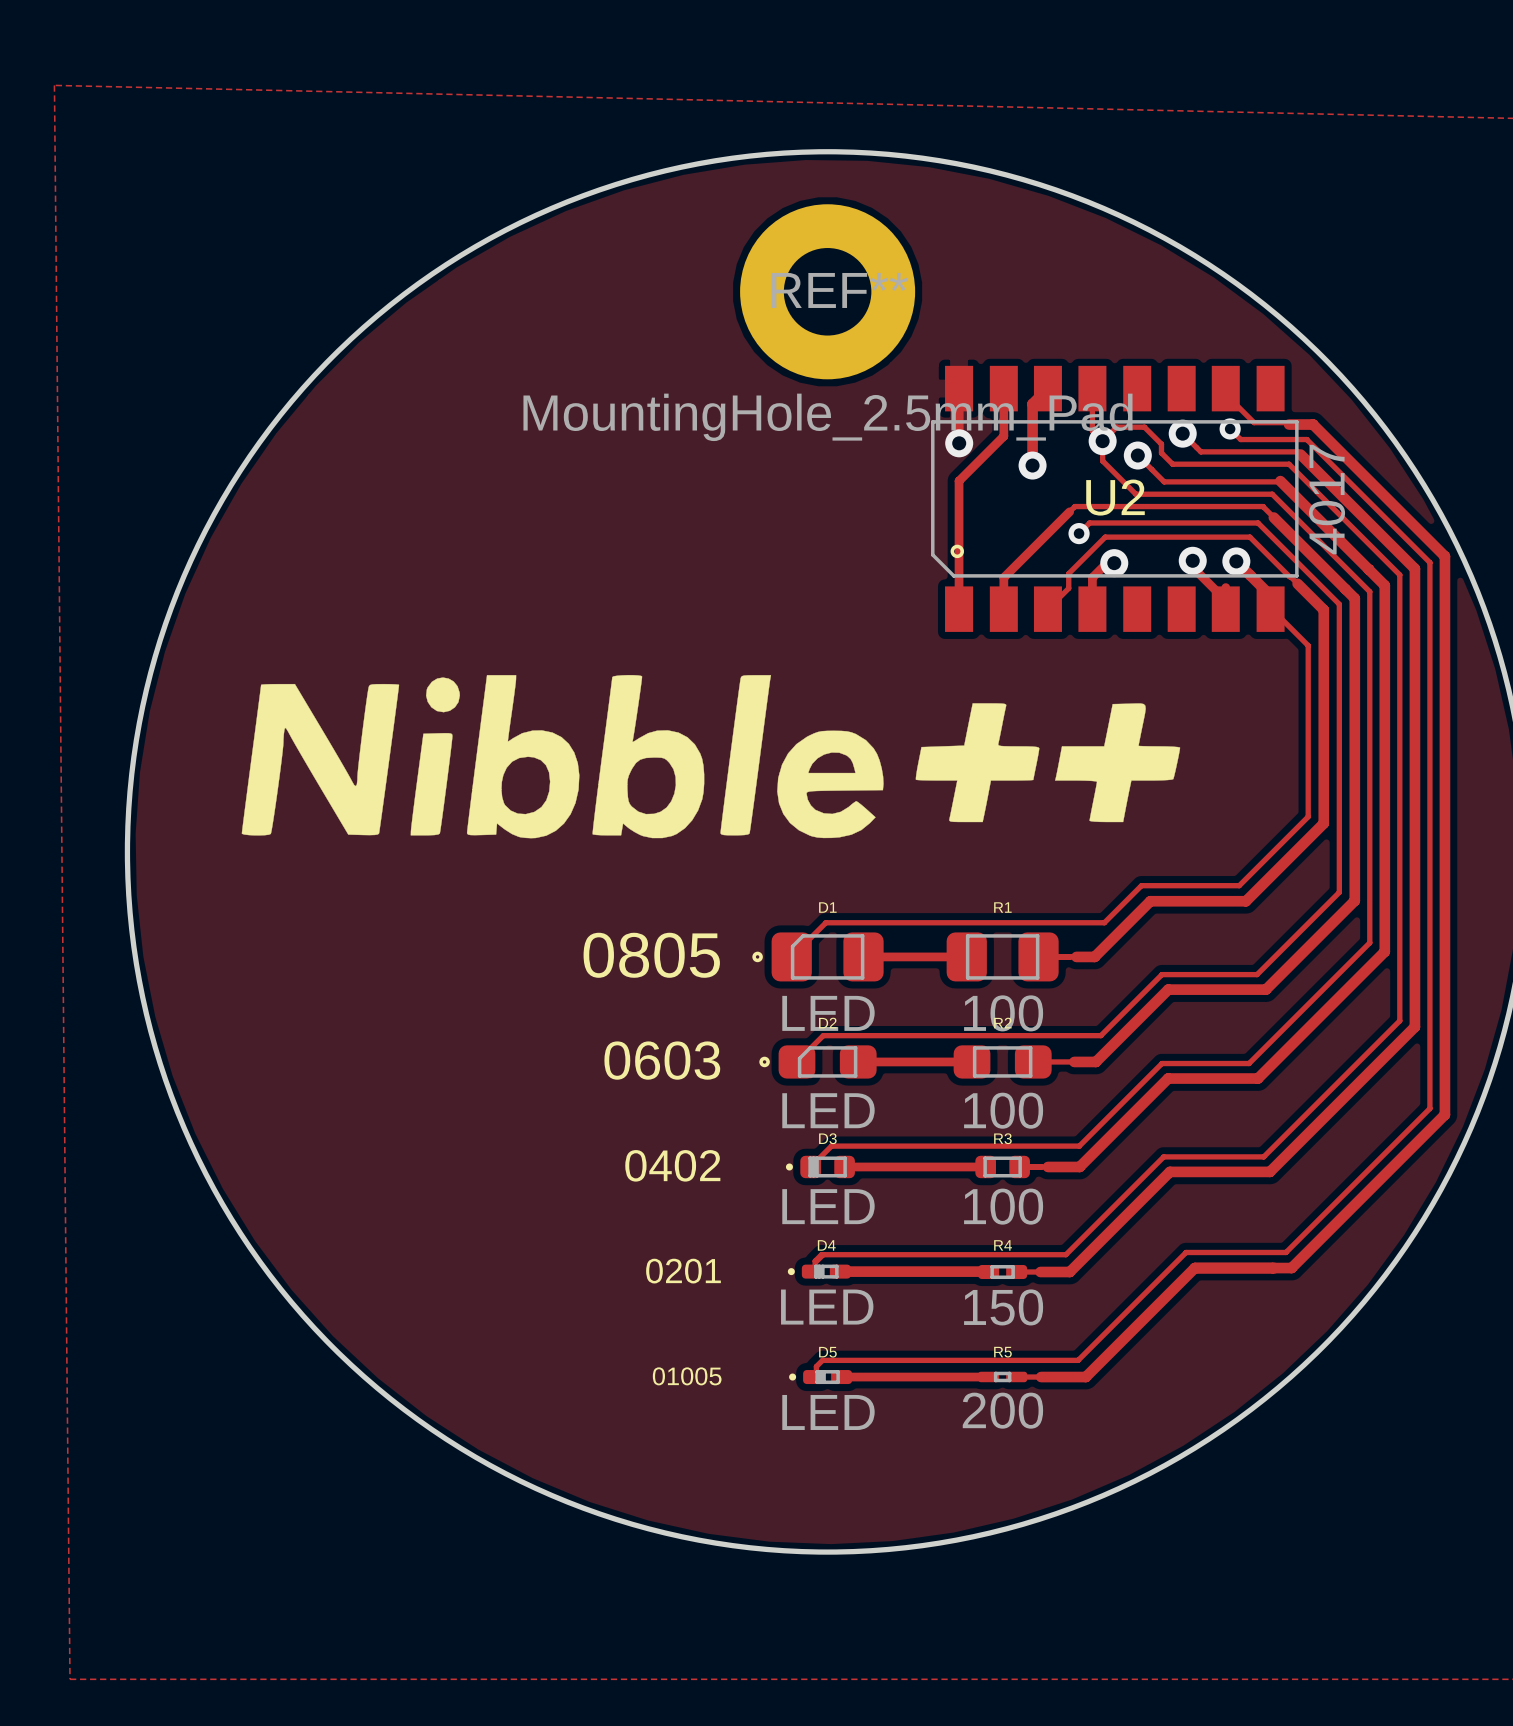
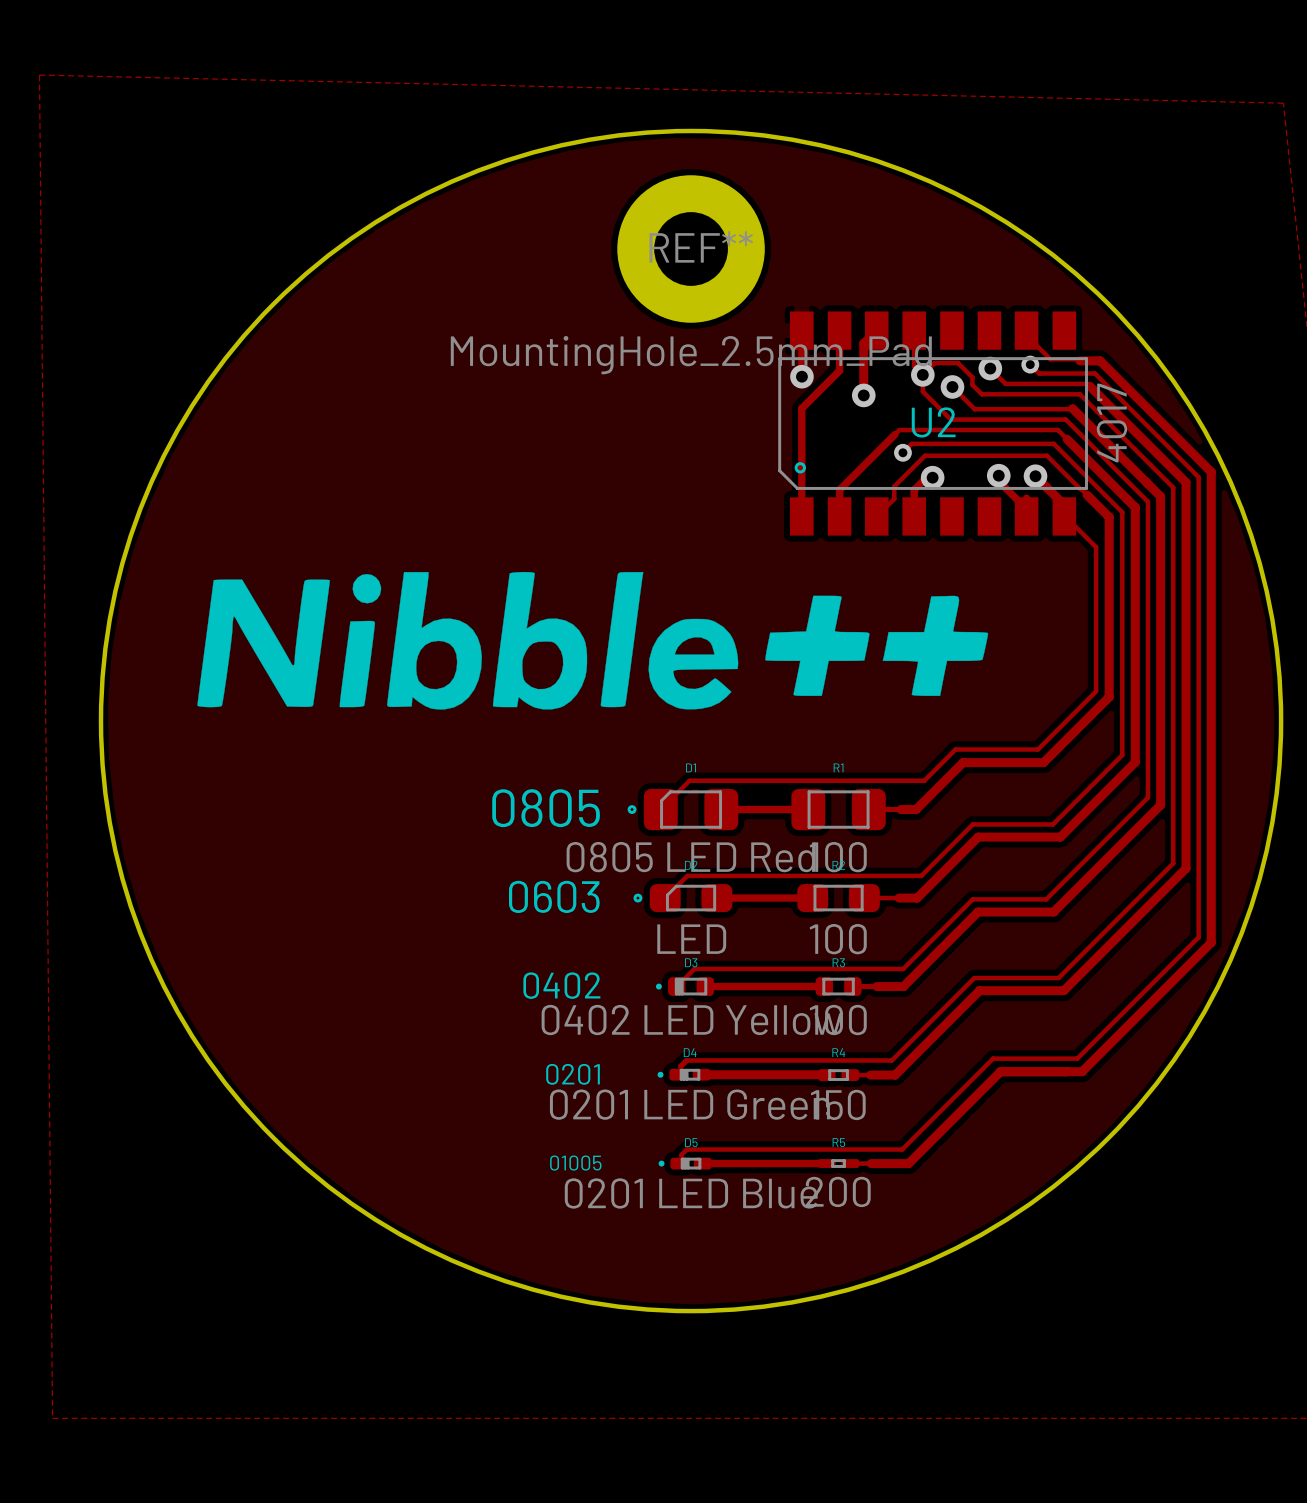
D1 value: LED (828, 1013) -> 0805 LED Red (690, 857)
D3 value: LED (828, 1206) -> 0402 LED Yellow (691, 1020)
D4 value: LED (827, 1307) -> 0201 LED Green (689, 1104)
D5 value: LED (828, 1412) -> 0201 LED Blue (691, 1193)

